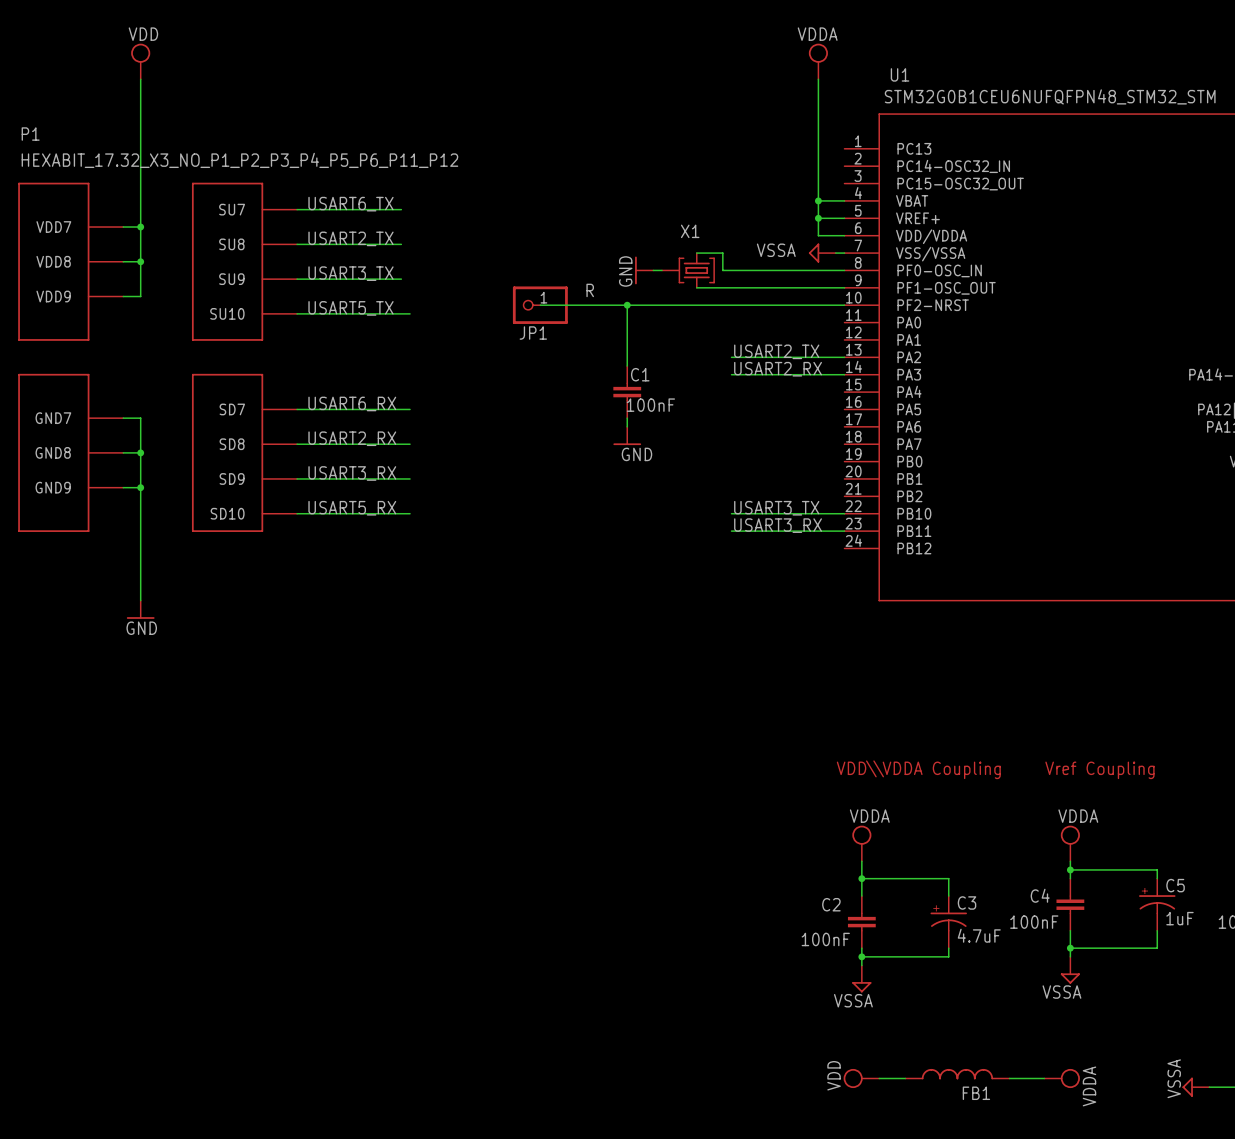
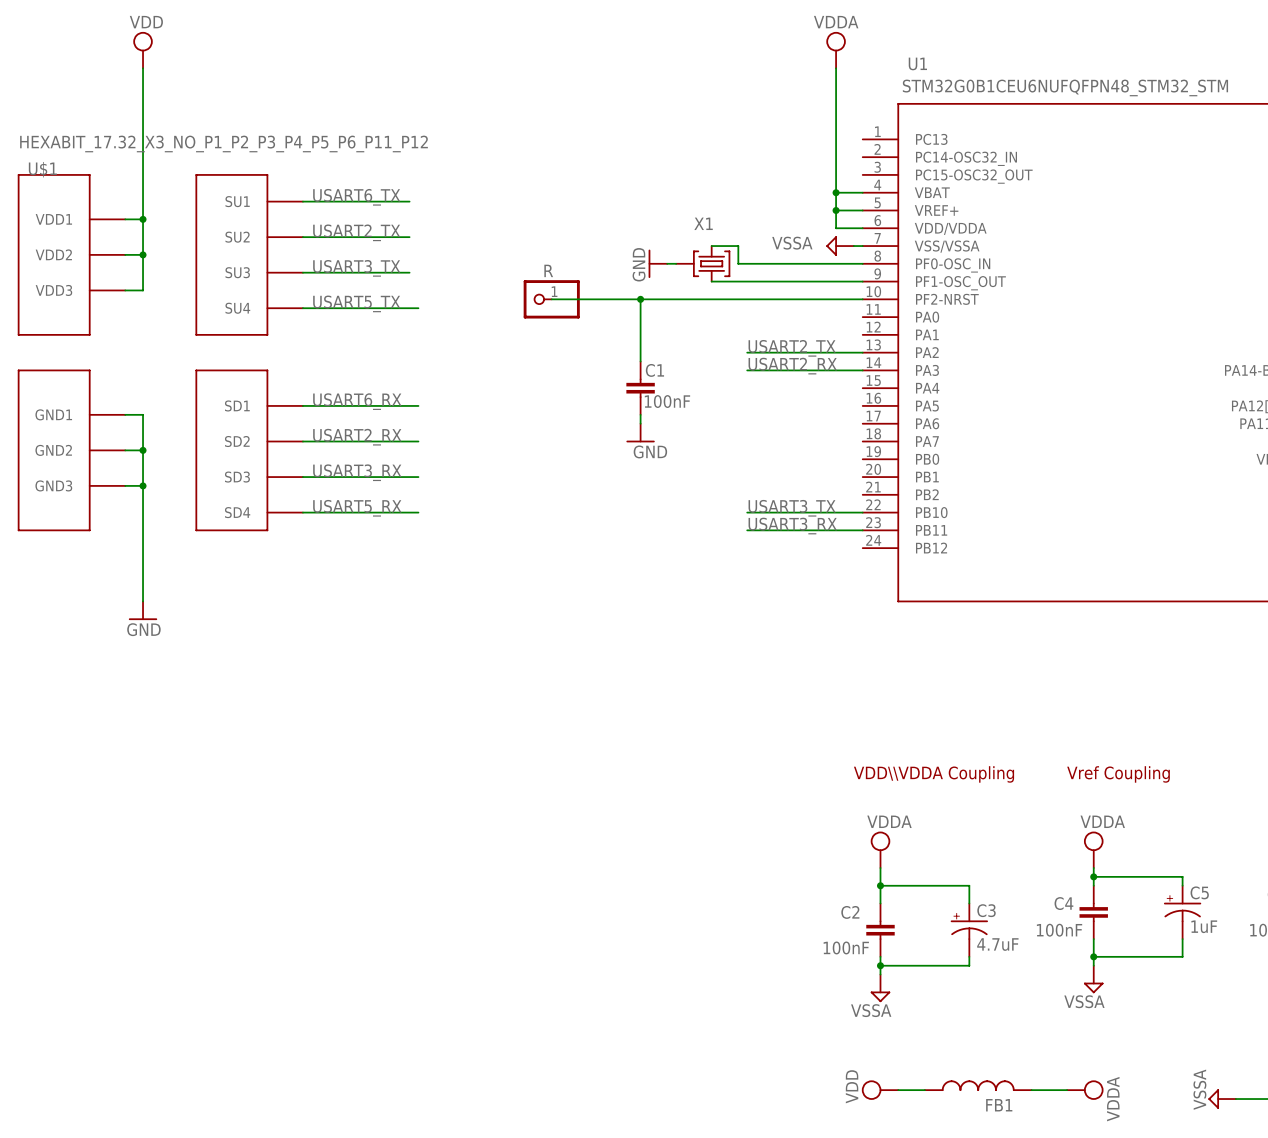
P1 name: P1 (30, 134) -> U$1 (42, 169)
P1 symbol: [18, 182, 298, 532] -> [17, 174, 303, 532]
text: R (590, 290) -> none
JP1 name: JP1 (533, 333) -> R (548, 270)

